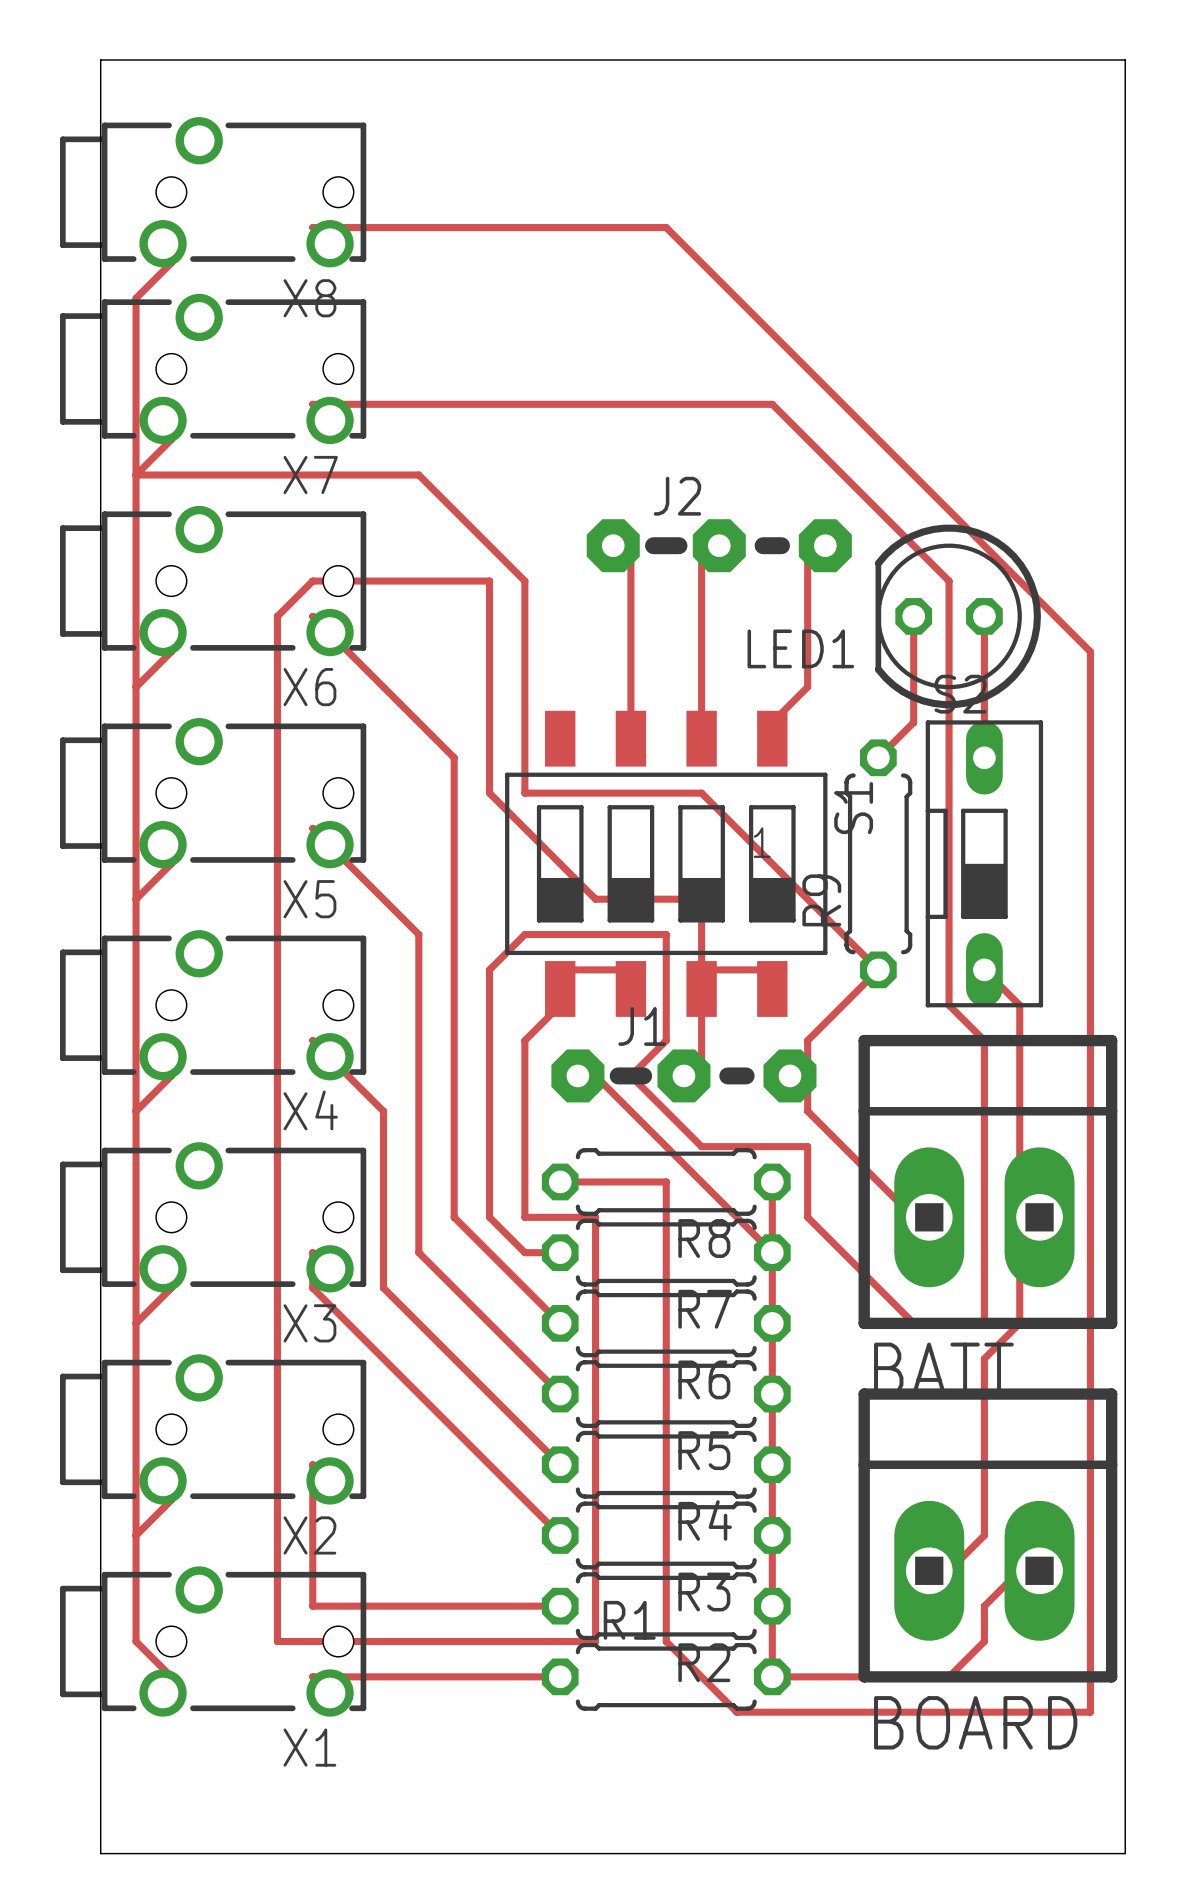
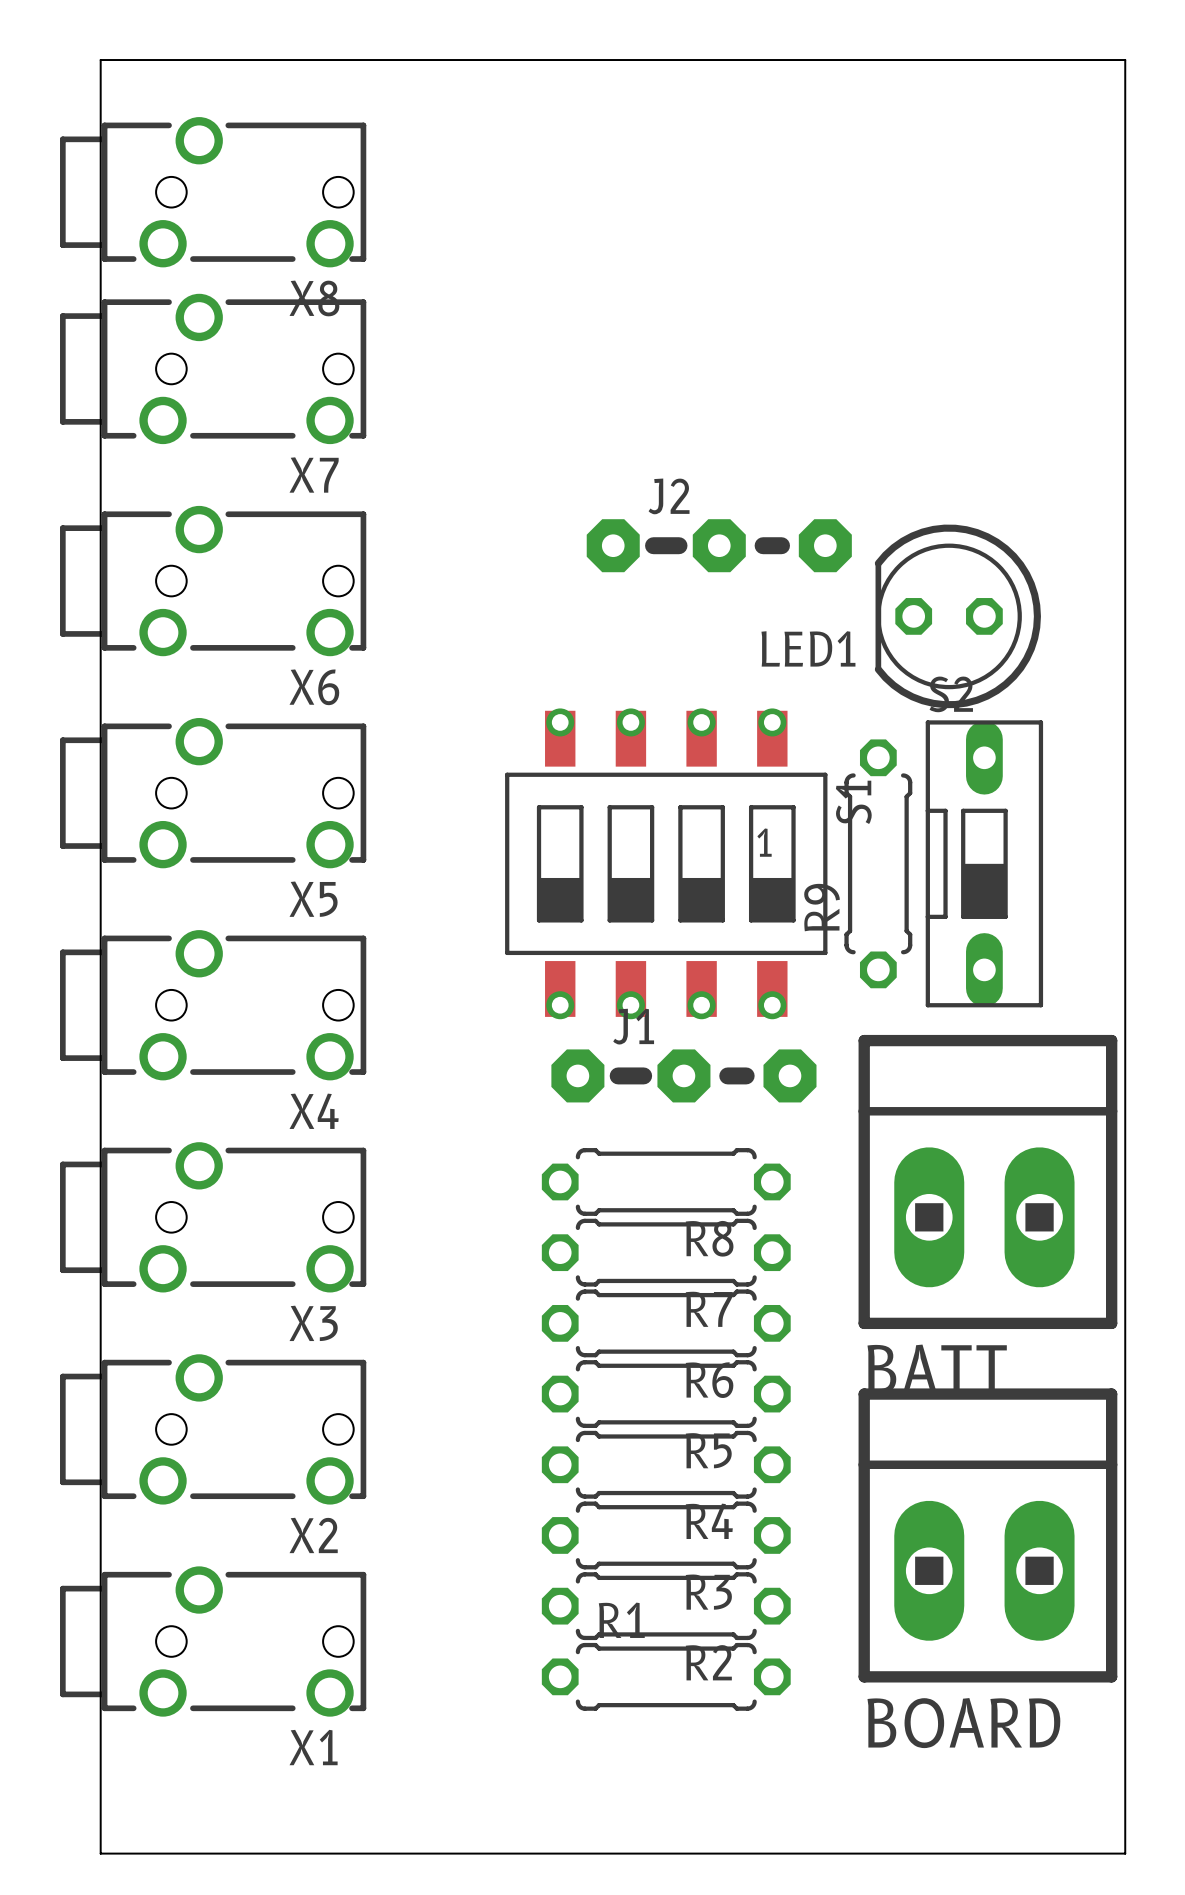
track: (163, 243) (171, 262) (136, 298) (136, 1641) (171, 1676) (163, 1693) -> none
track: (330, 243) (312, 227) (666, 227) (1090, 651) (1090, 1712) (736, 1712) (666, 1641) (666, 1181) (560, 1181) -> none
track: (163, 420) (171, 439) (136, 475) (418, 475) (524, 581) (524, 793) (701, 793) (878, 969) (807, 1040) (807, 1111) (913, 1217) (929, 1217) -> none
track: (330, 420) (312, 404) (772, 404) (949, 581) (949, 1005) (984, 1040) (984, 1323) (913, 1323) (807, 1217) (807, 1146) (701, 1146) (630, 1075) (666, 1040) (666, 934) (524, 934) (489, 969) (489, 1217) (524, 1252) (560, 1252) -> none
track: (613, 545) (630, 545) (630, 738) -> none
track: (701, 545) (701, 738) -> none
track: (825, 545) (807, 545) (807, 687) (772, 722) (772, 738) -> none
track: (913, 616) (913, 722) (878, 757) -> none
track: (984, 616) (984, 757) -> none
track: (163, 632) (171, 651) (136, 687) -> none
track: (330, 632) (312, 616) (454, 757) (454, 1217) (560, 1323) -> none
via: none -> (560, 722)
via: none -> (630, 722)
via: none -> (701, 722)
via: none -> (772, 722)
track: (163, 844) (171, 863) (136, 899) -> none
track: (330, 844) (312, 828) (418, 934) (418, 1252) (560, 1394) -> none
track: (701, 969) (772, 969) (772, 988) -> none
track: (984, 969) (1019, 1005) (1019, 1323) (984, 1358) (984, 1535) (949, 1570) (929, 1570) -> none
track: (630, 988) (630, 969) (560, 969) (560, 1005) (524, 1040) (524, 1217) (595, 1217) (595, 1641) (277, 1641) (277, 616) (312, 581) (489, 581) (489, 793) (595, 899) (701, 899) (701, 1075) -> none
via: none -> (560, 1005)
via: none -> (630, 1005)
via: none -> (701, 1005)
via: none -> (772, 1005)
track: (163, 1056) (171, 1075) (136, 1111) -> none
track: (330, 1056) (312, 1040) (383, 1111) (383, 1288) (560, 1464) -> none
track: (577, 1075) (595, 1075) (772, 1252) -> none
track: (772, 1181) (772, 1676) (949, 1676) (984, 1641) (984, 1606) (1019, 1570) (1039, 1570) -> none
track: (163, 1268) (171, 1288) (136, 1323) -> none
track: (330, 1268) (312, 1252) (312, 1288) (560, 1535) -> none
track: (163, 1480) (171, 1500) (136, 1535) -> none
track: (330, 1480) (312, 1464) (312, 1606) (560, 1606) -> none
track: (560, 1676) (312, 1676) (330, 1693) -> none

